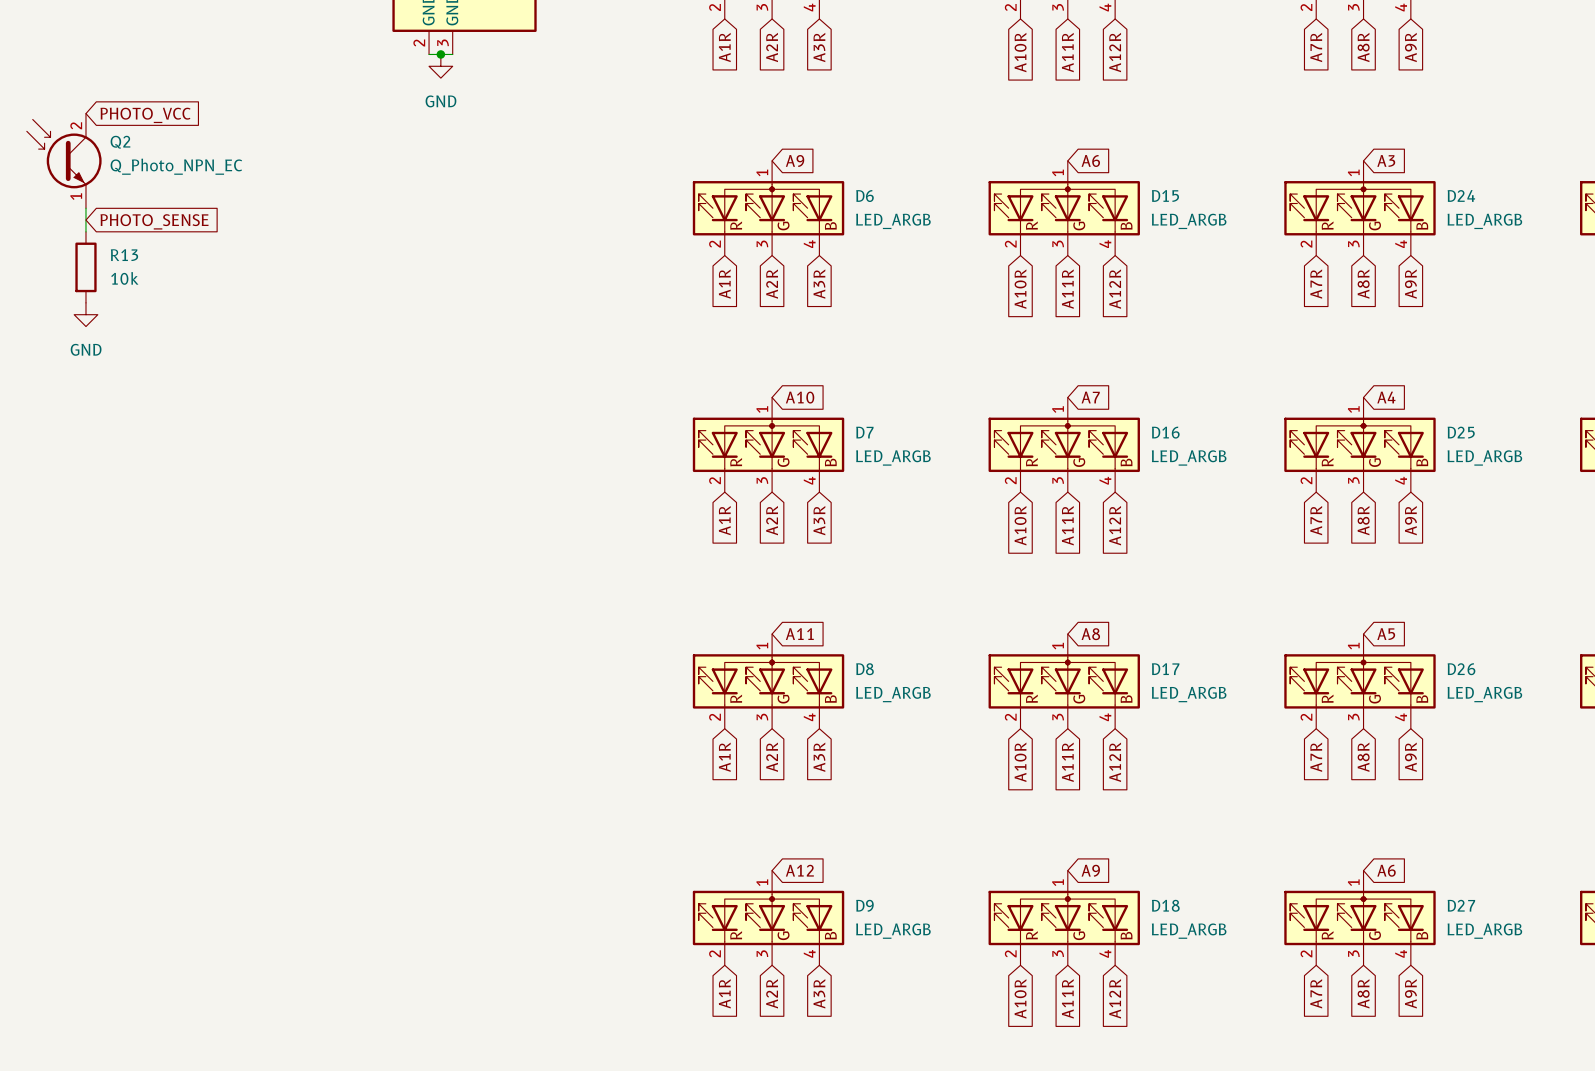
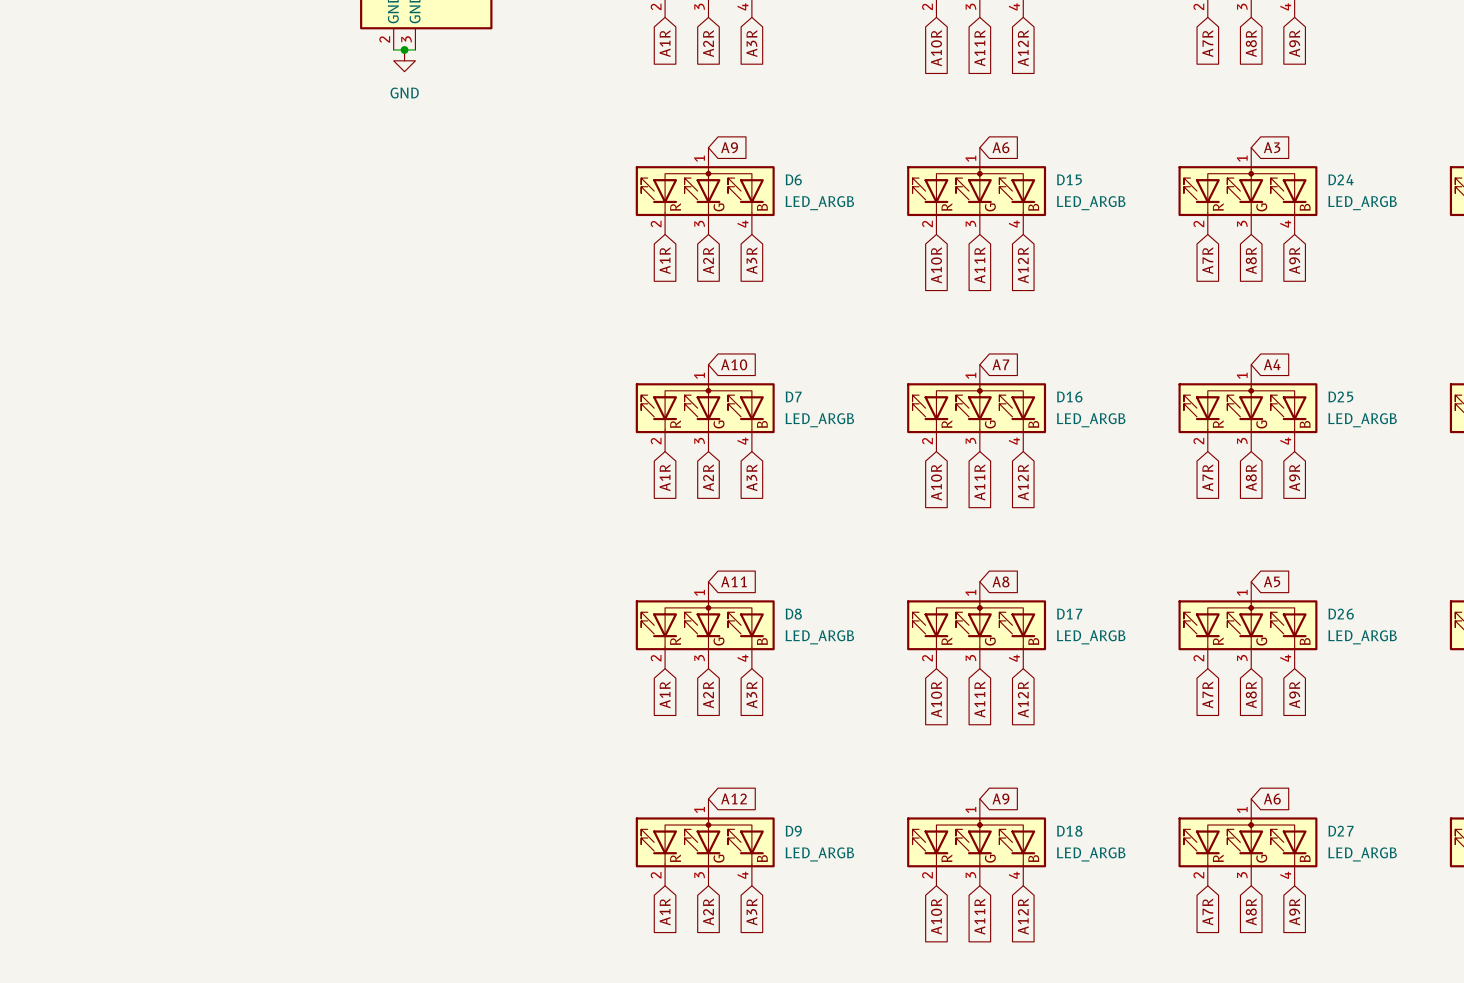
global label: PHOTO_VCC (145, 115) -> none
Q2: Q_Photo_NPN_EC (64, 160) -> none
wire: (85, 208) (85, 231) -> none
global label: PHOTO_SENSE (154, 221) -> none
R13: 10k (85, 267) -> none
power symbol: GND (85, 314) -> none

